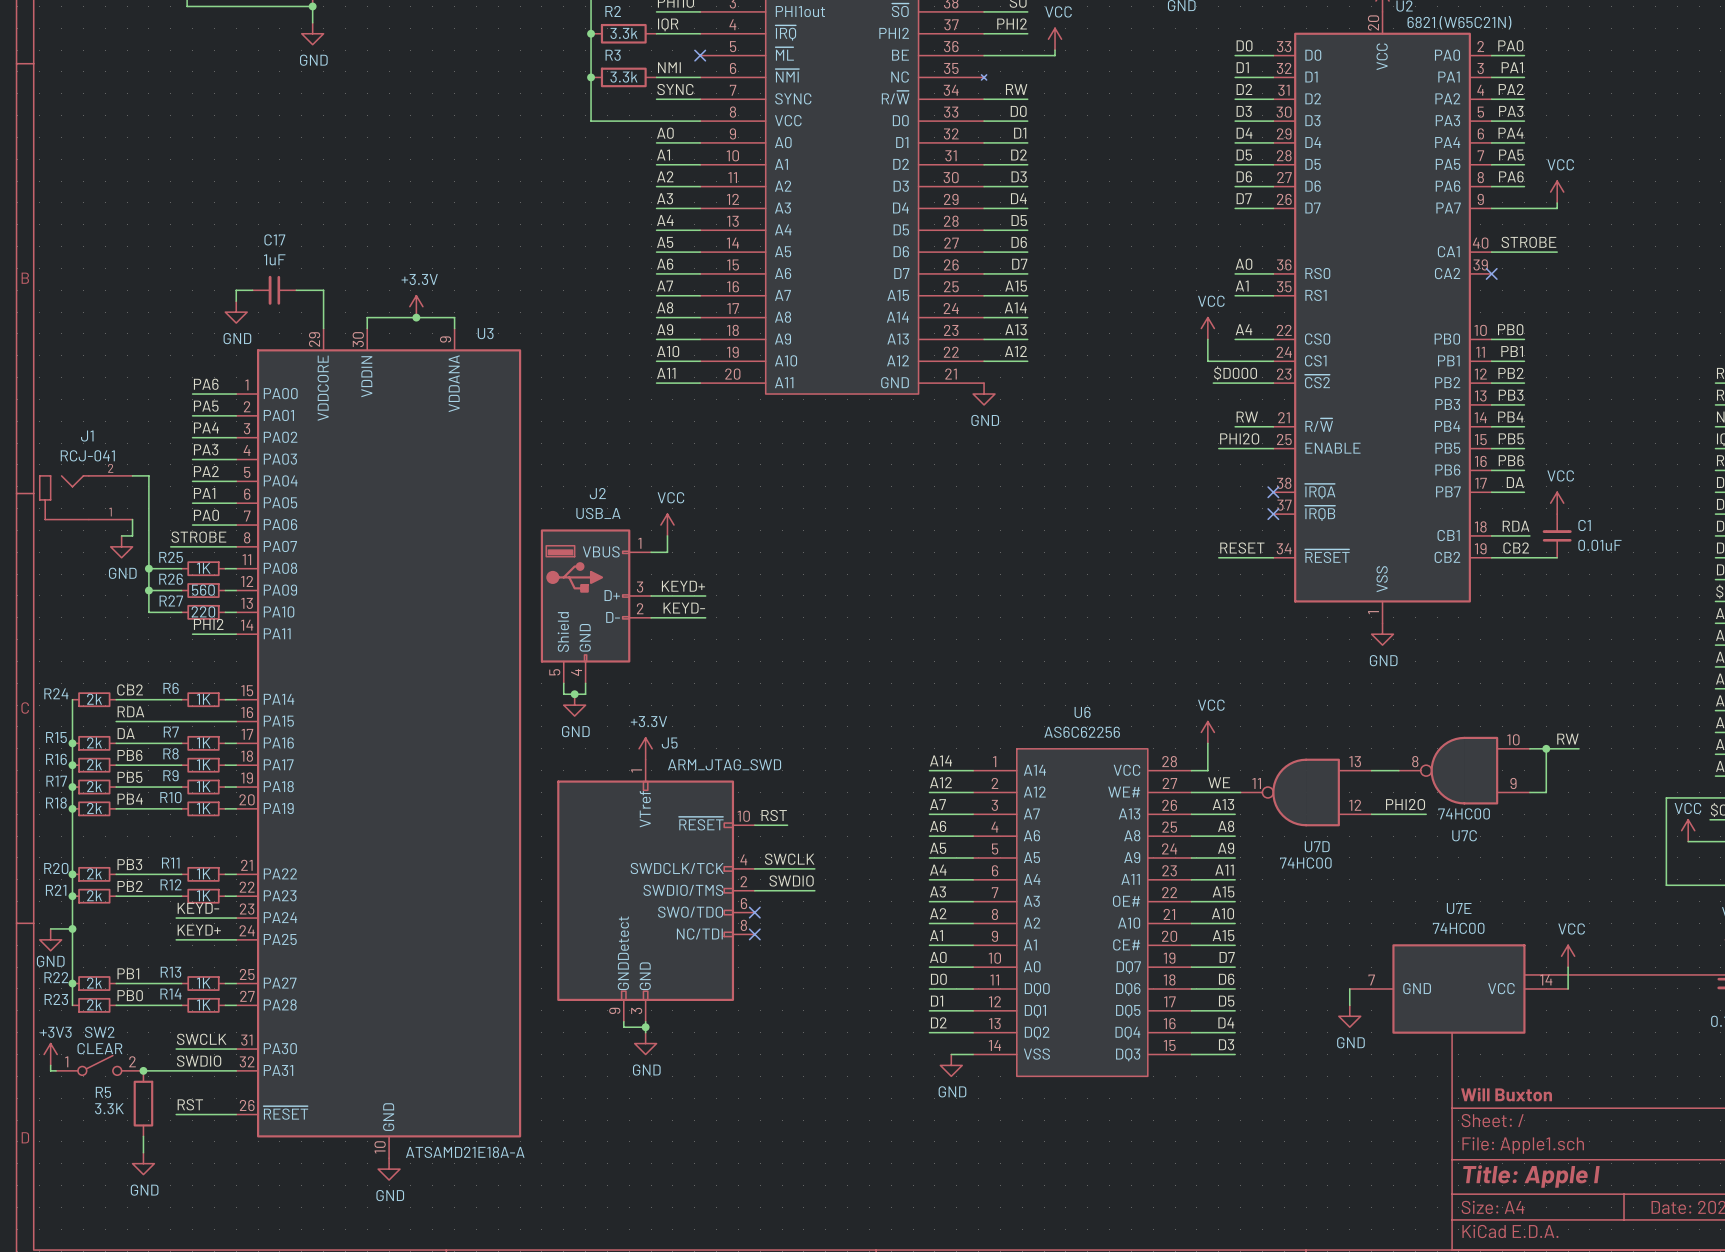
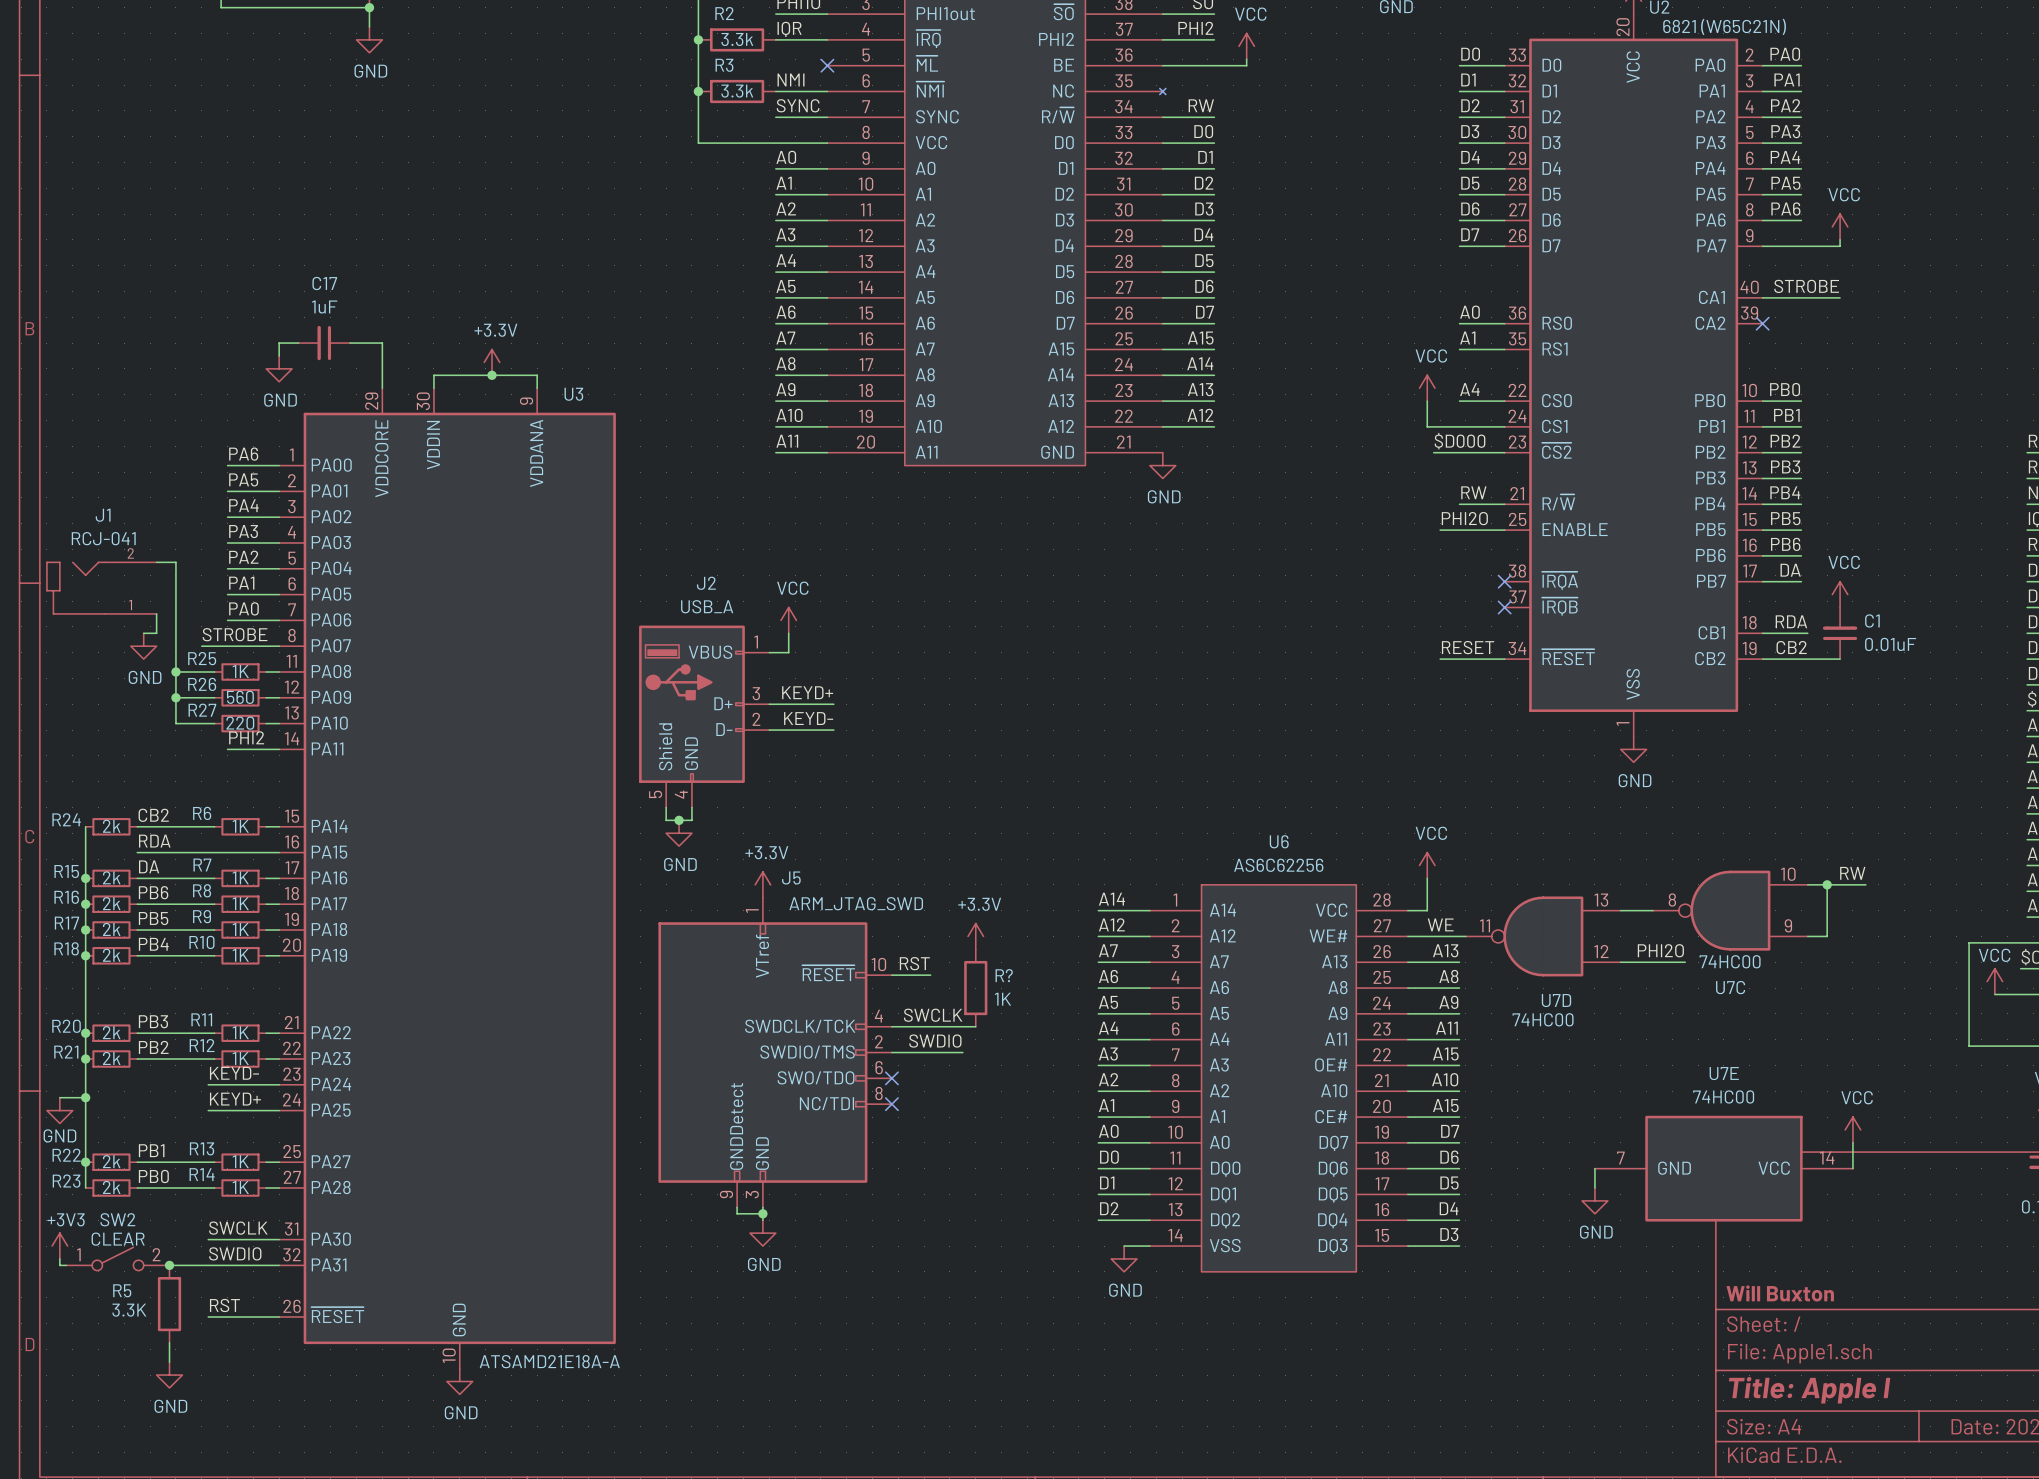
power symbol: none -> +3.3V (975, 936)
R?: none -> 1K (975, 988)
wire: none -> (962, 1026) (975, 1026)

